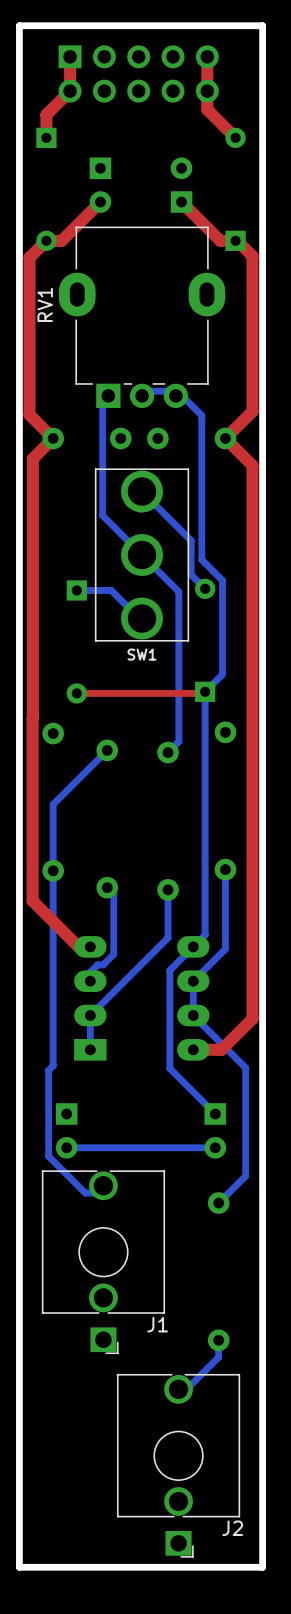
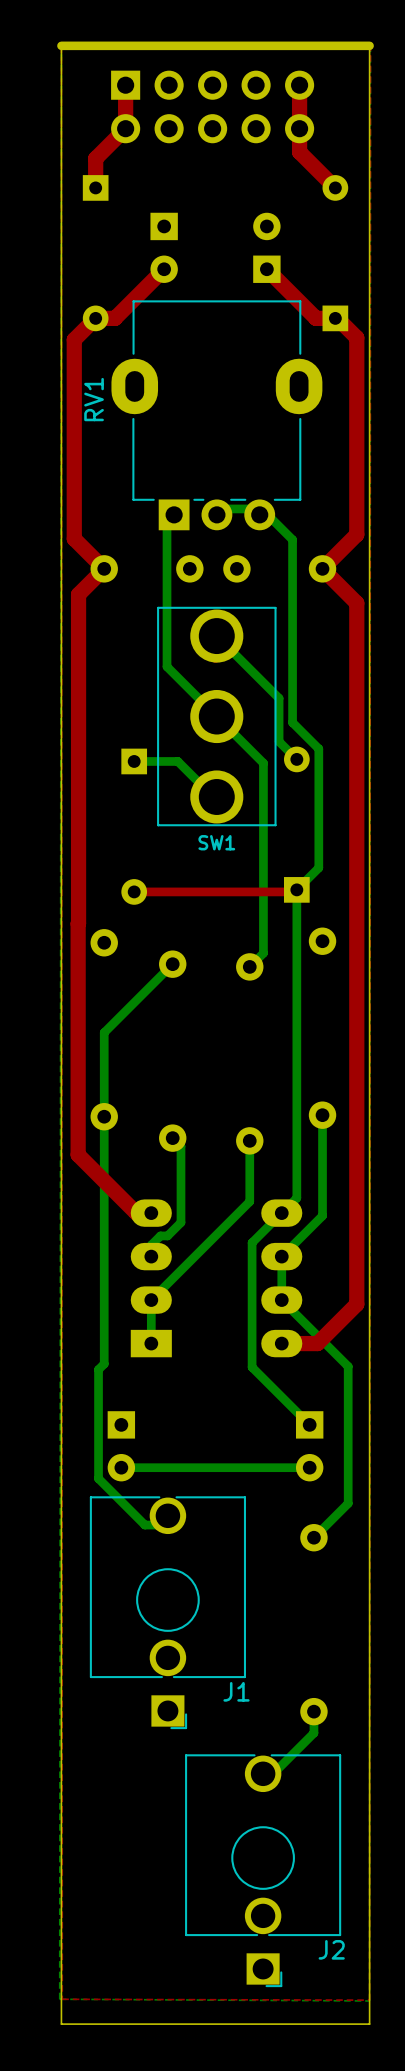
board edge width: thick (19, 25) (19, 1567) -> thin (61, 45) (61, 1999)
board edge width: thick (262, 25) (262, 1567) -> thin (369, 45) (369, 1999)
board edge: (19, 1567) (262, 1567) -> (61, 1999) (61, 2024) (369, 2024) (369, 1999)

